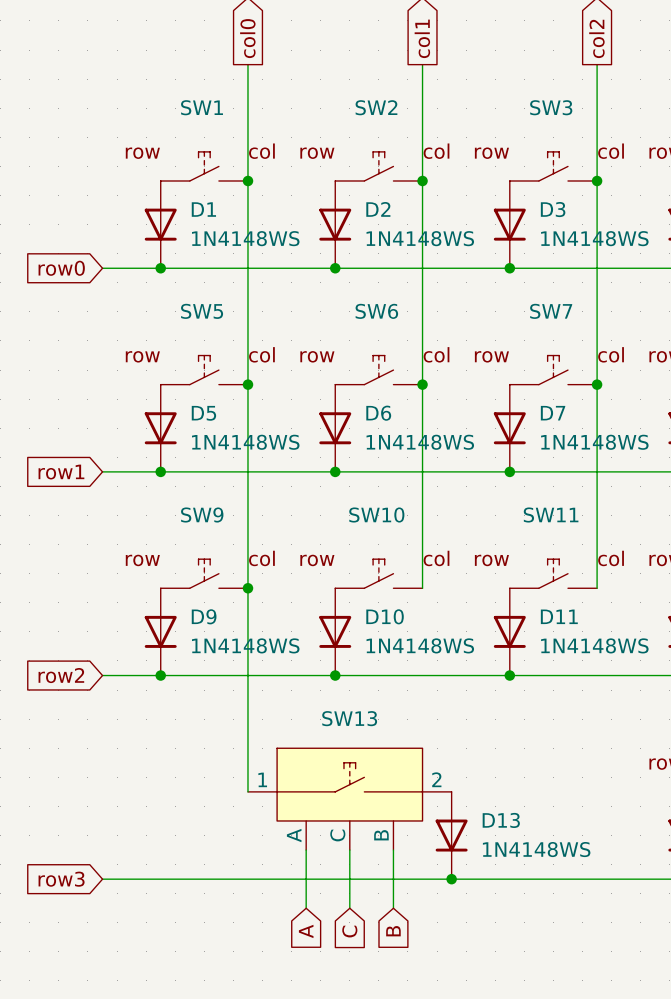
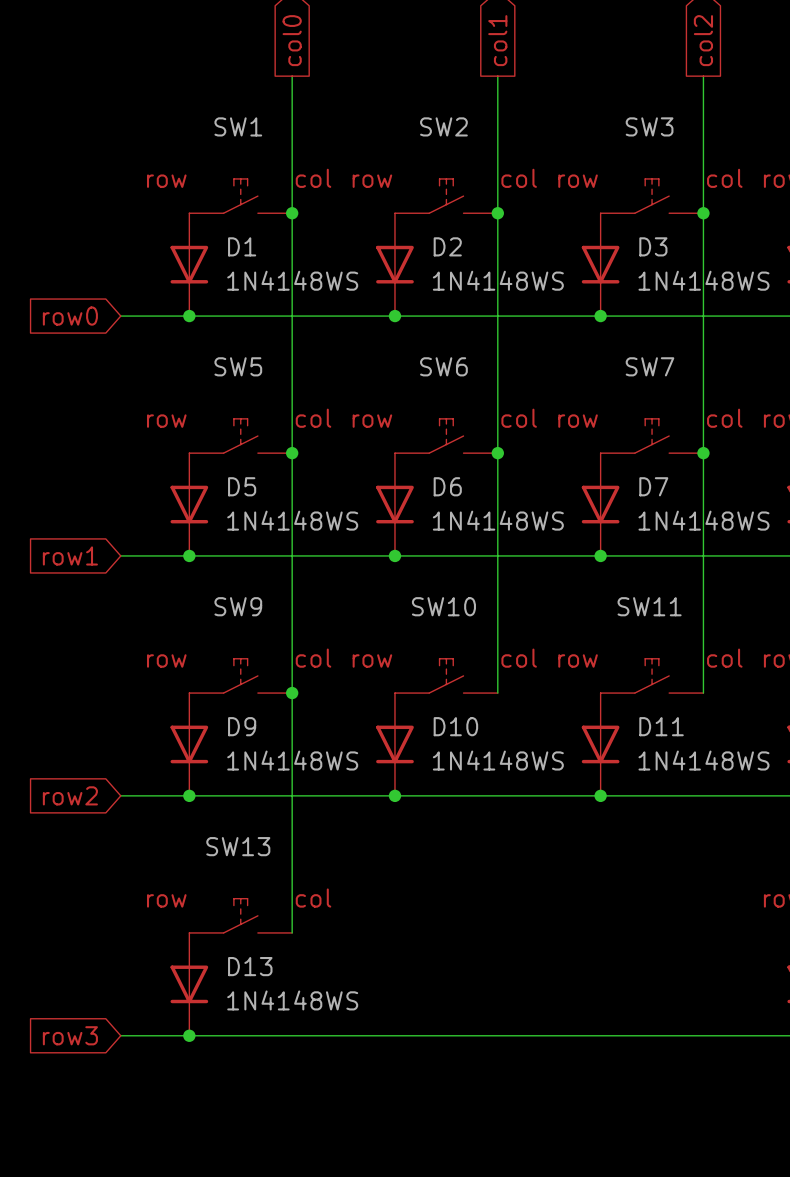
SW13 symbol: [247, 748, 452, 851] -> [189, 898, 293, 933]
D13 position: (451, 835) -> (189, 984)
wire: (306, 850) (306, 908) -> none
wire: (349, 850) (349, 908) -> none
wire: (393, 850) (393, 908) -> none
junction: none -> (189, 1035)
junction: (451, 879) -> none
global label: A (306, 931) -> none
global label: C (349, 931) -> none
global label: B (393, 931) -> none

